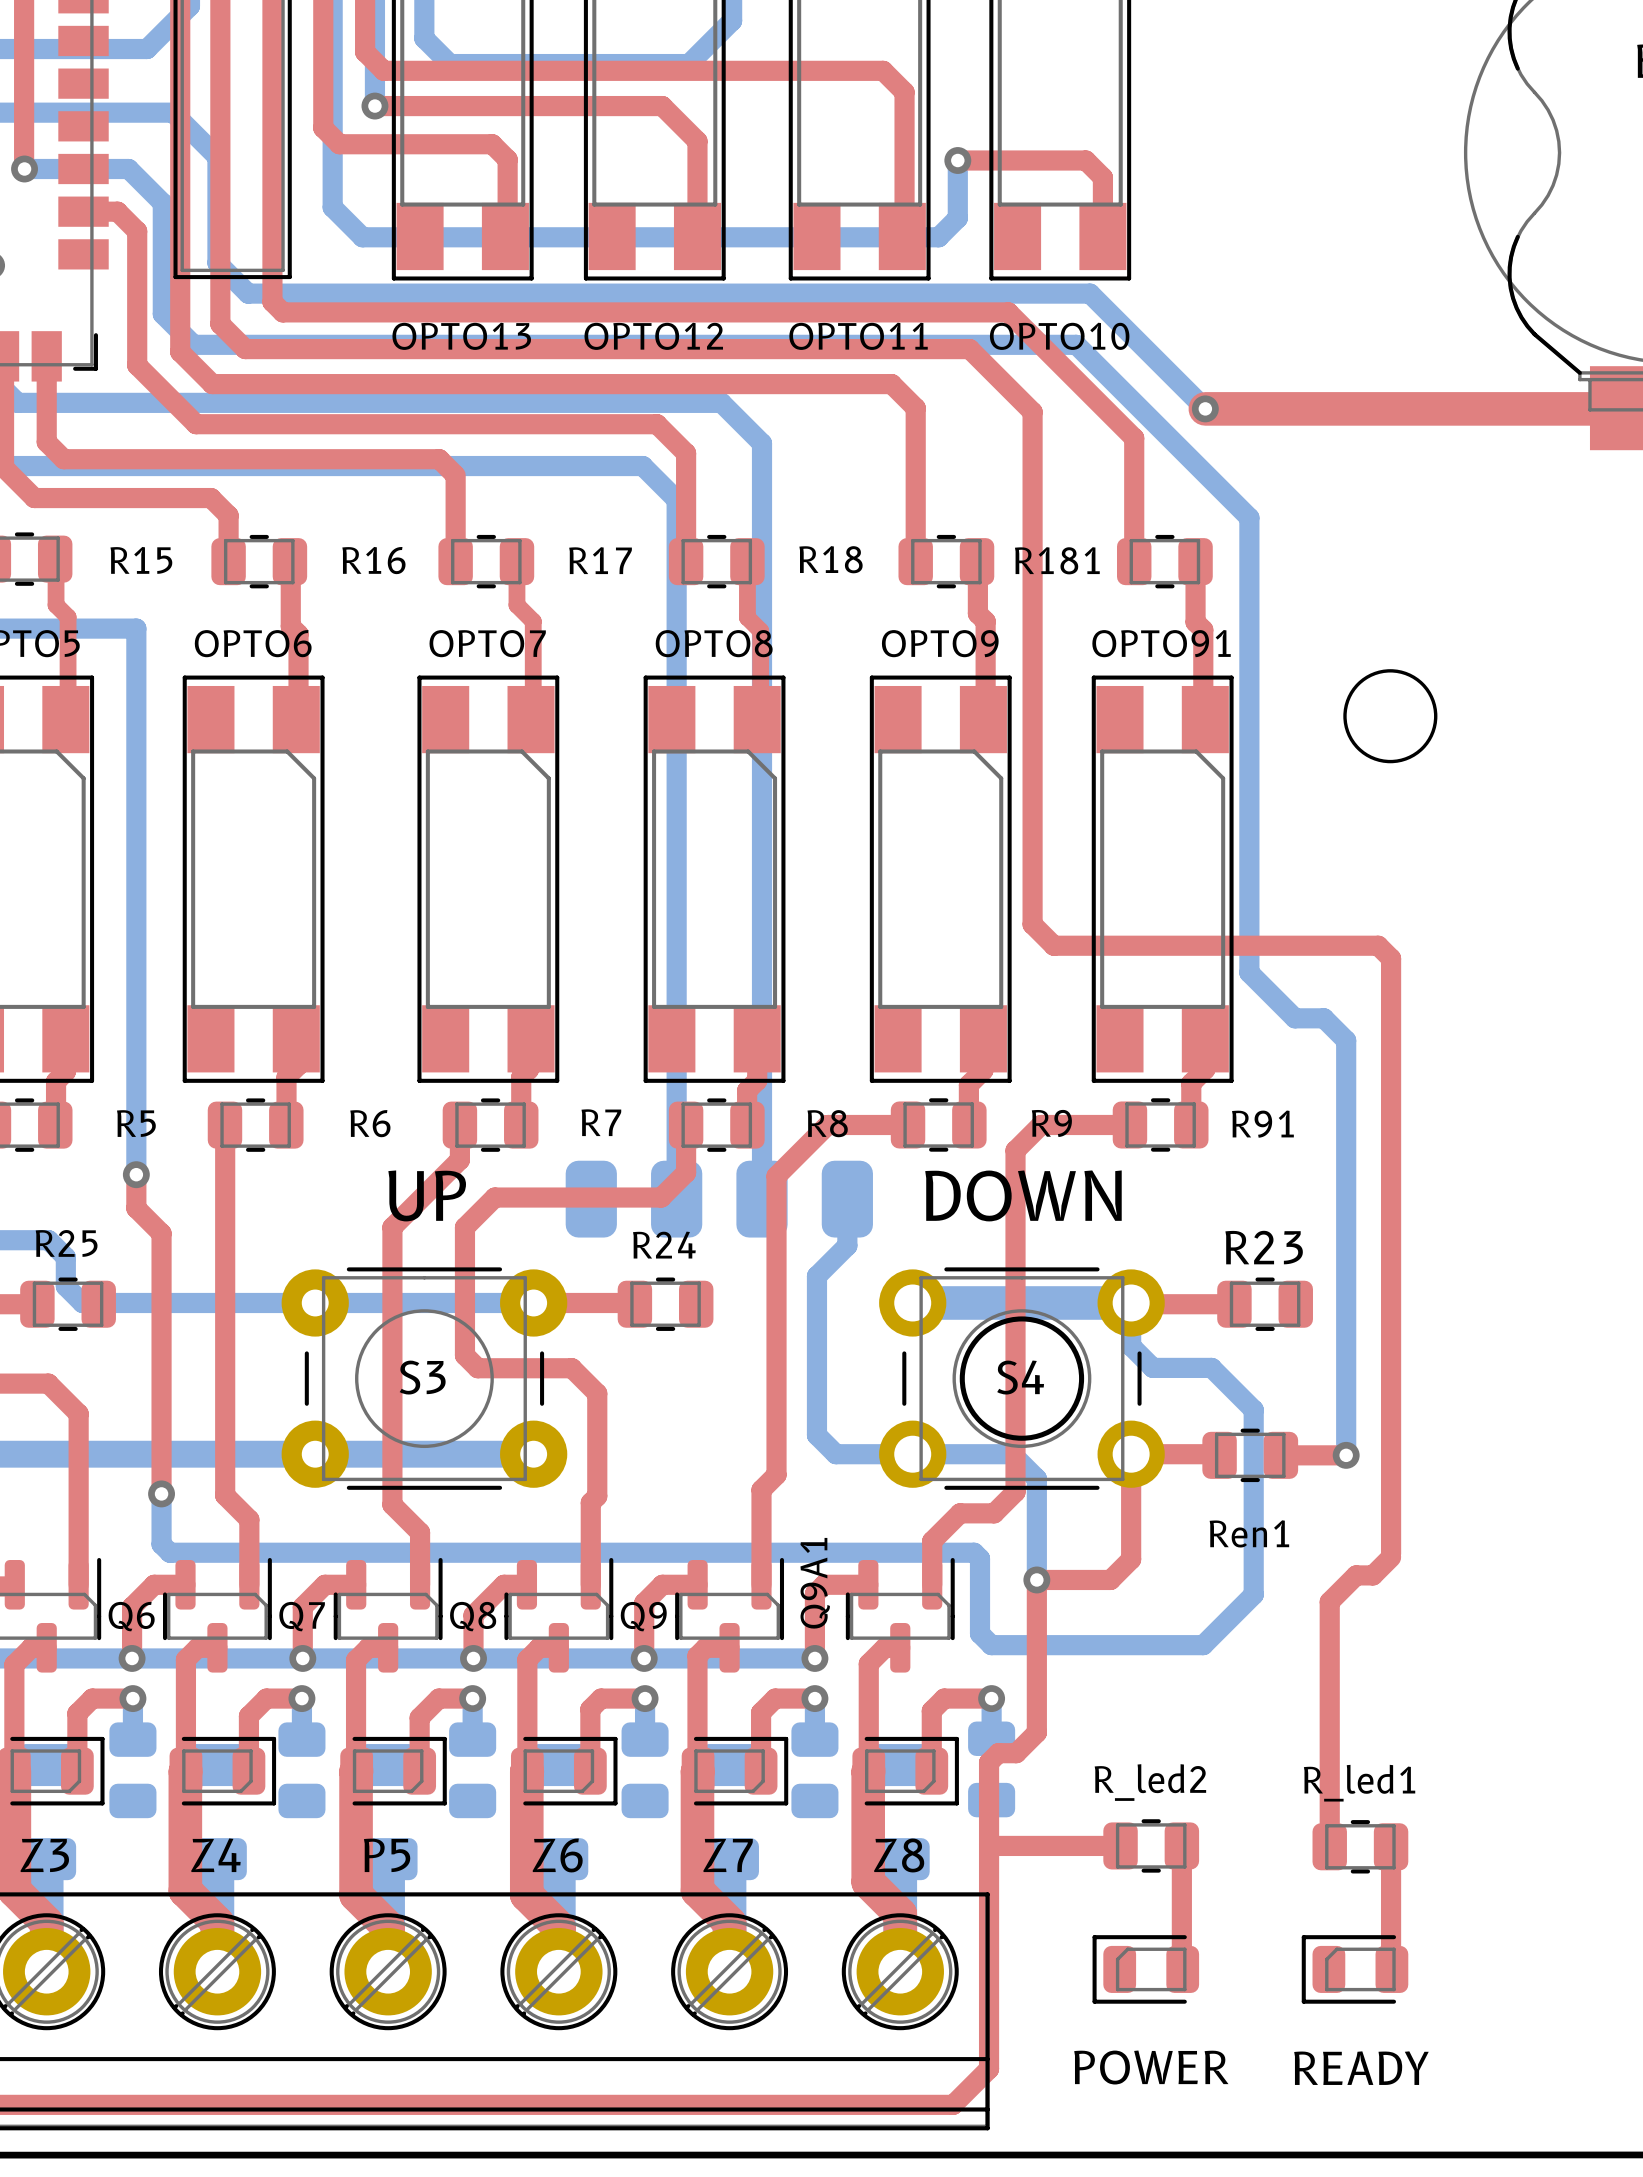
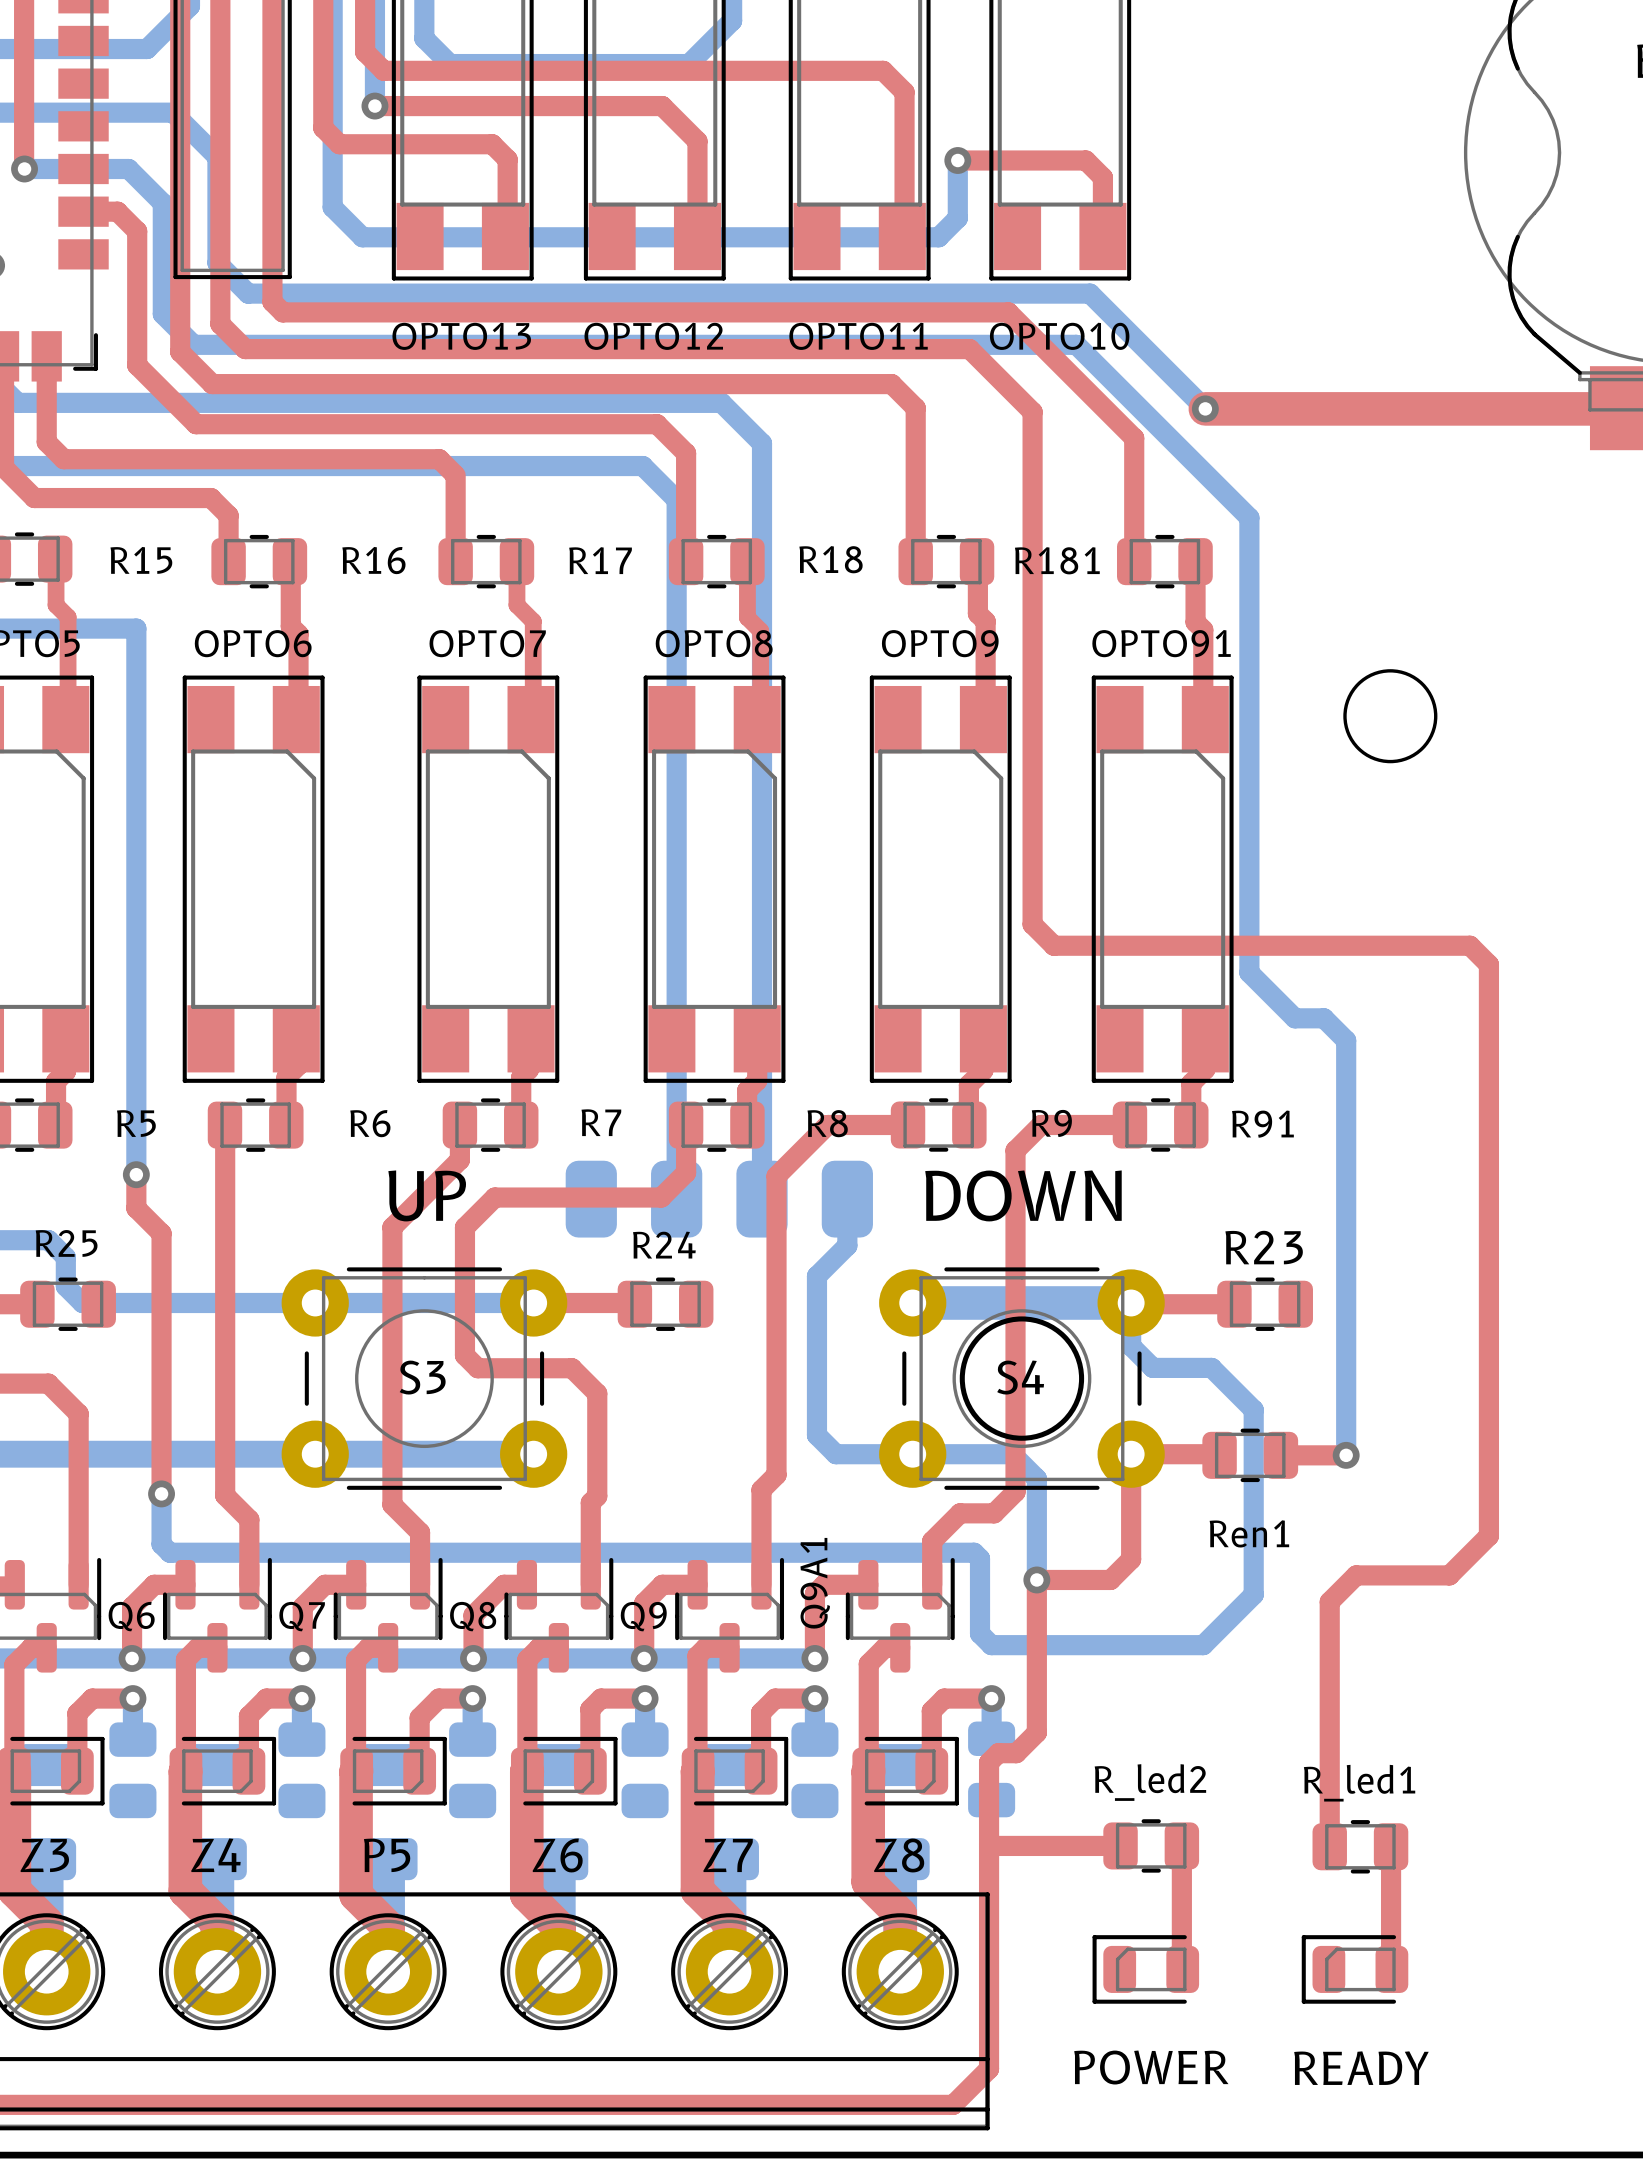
top track: (1378, 945) (1391, 958) (1391, 1557) (1373, 1575) -> (1378, 945) (1470, 945) (1488, 964) (1488, 1535) (1449, 1575) (1373, 1575)
S4 footprint: [879, 1267, 1165, 1490] -> [879, 1267, 1165, 1490]

